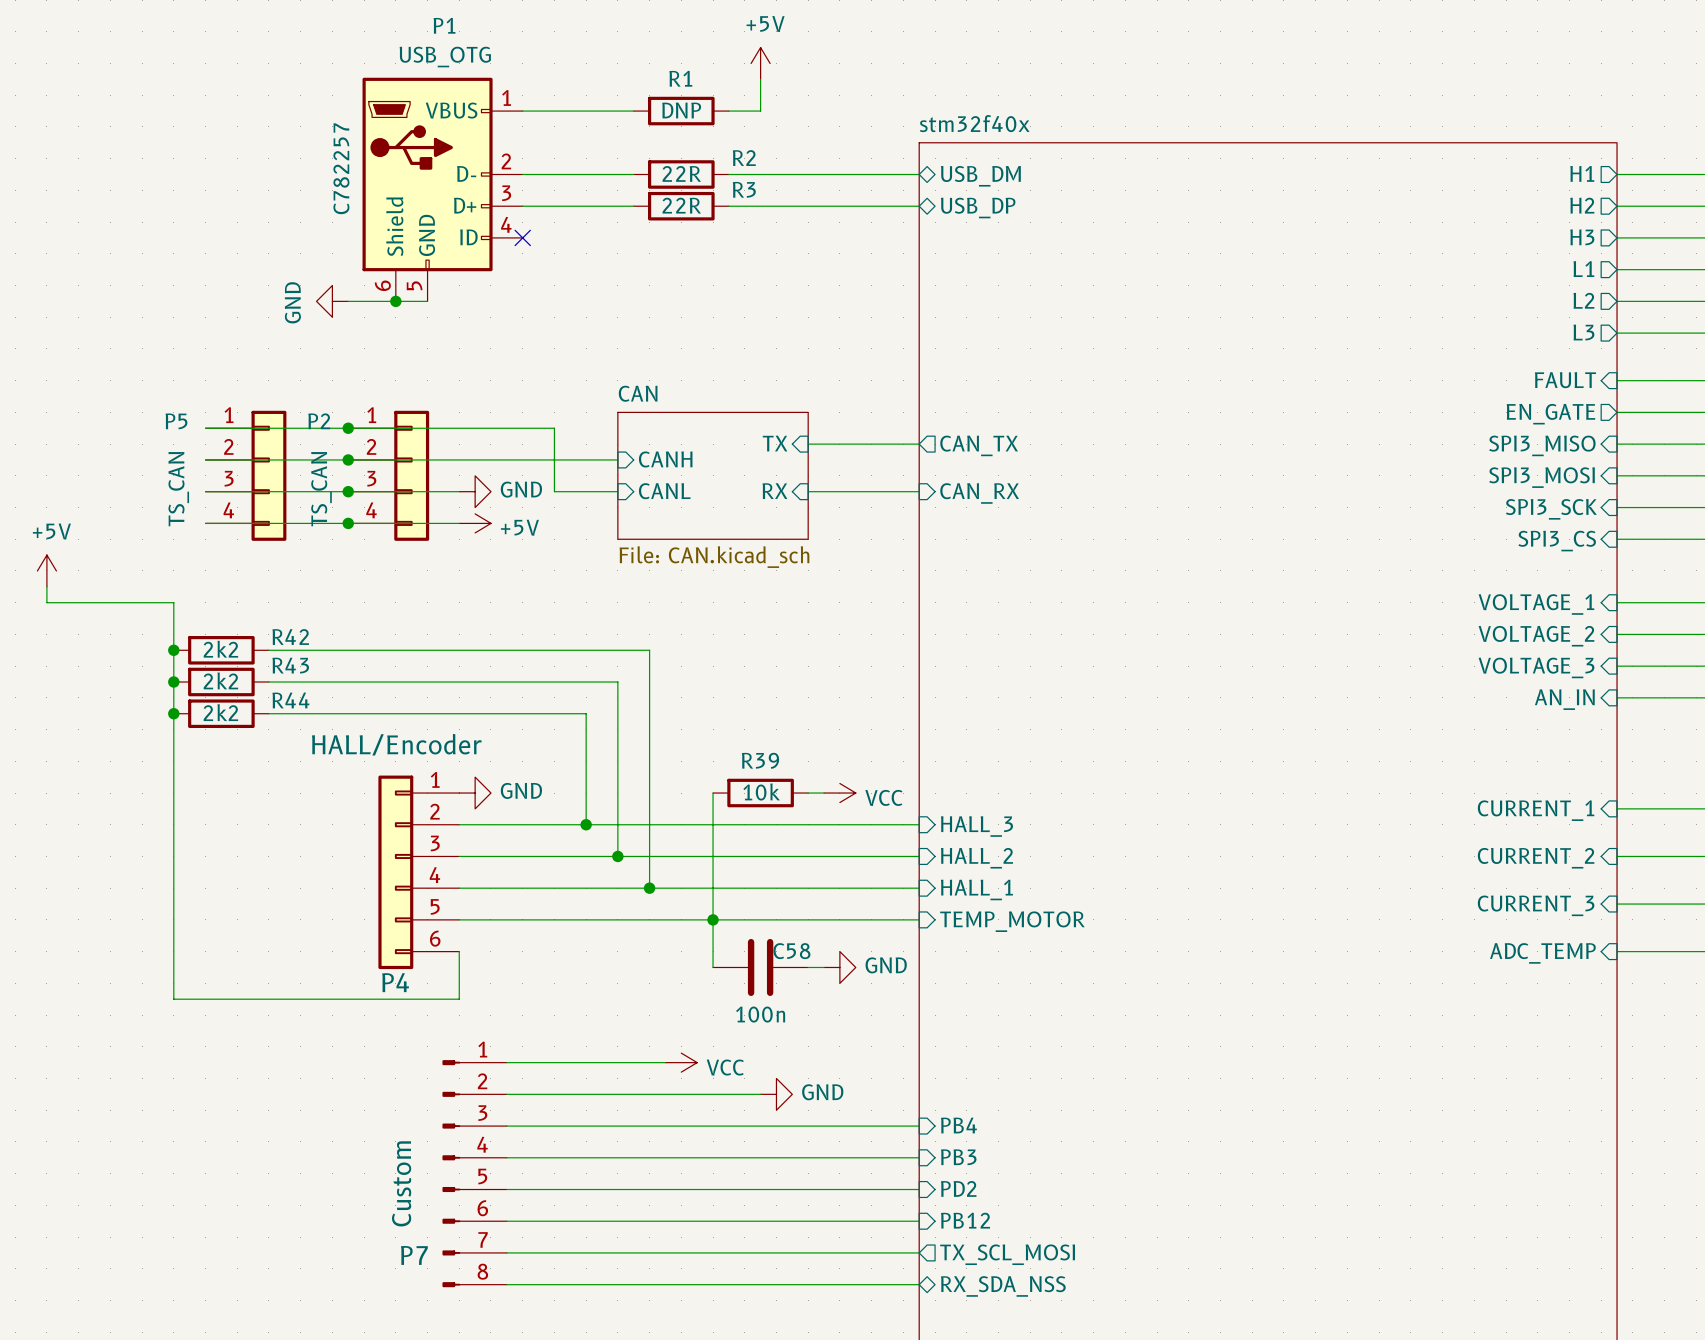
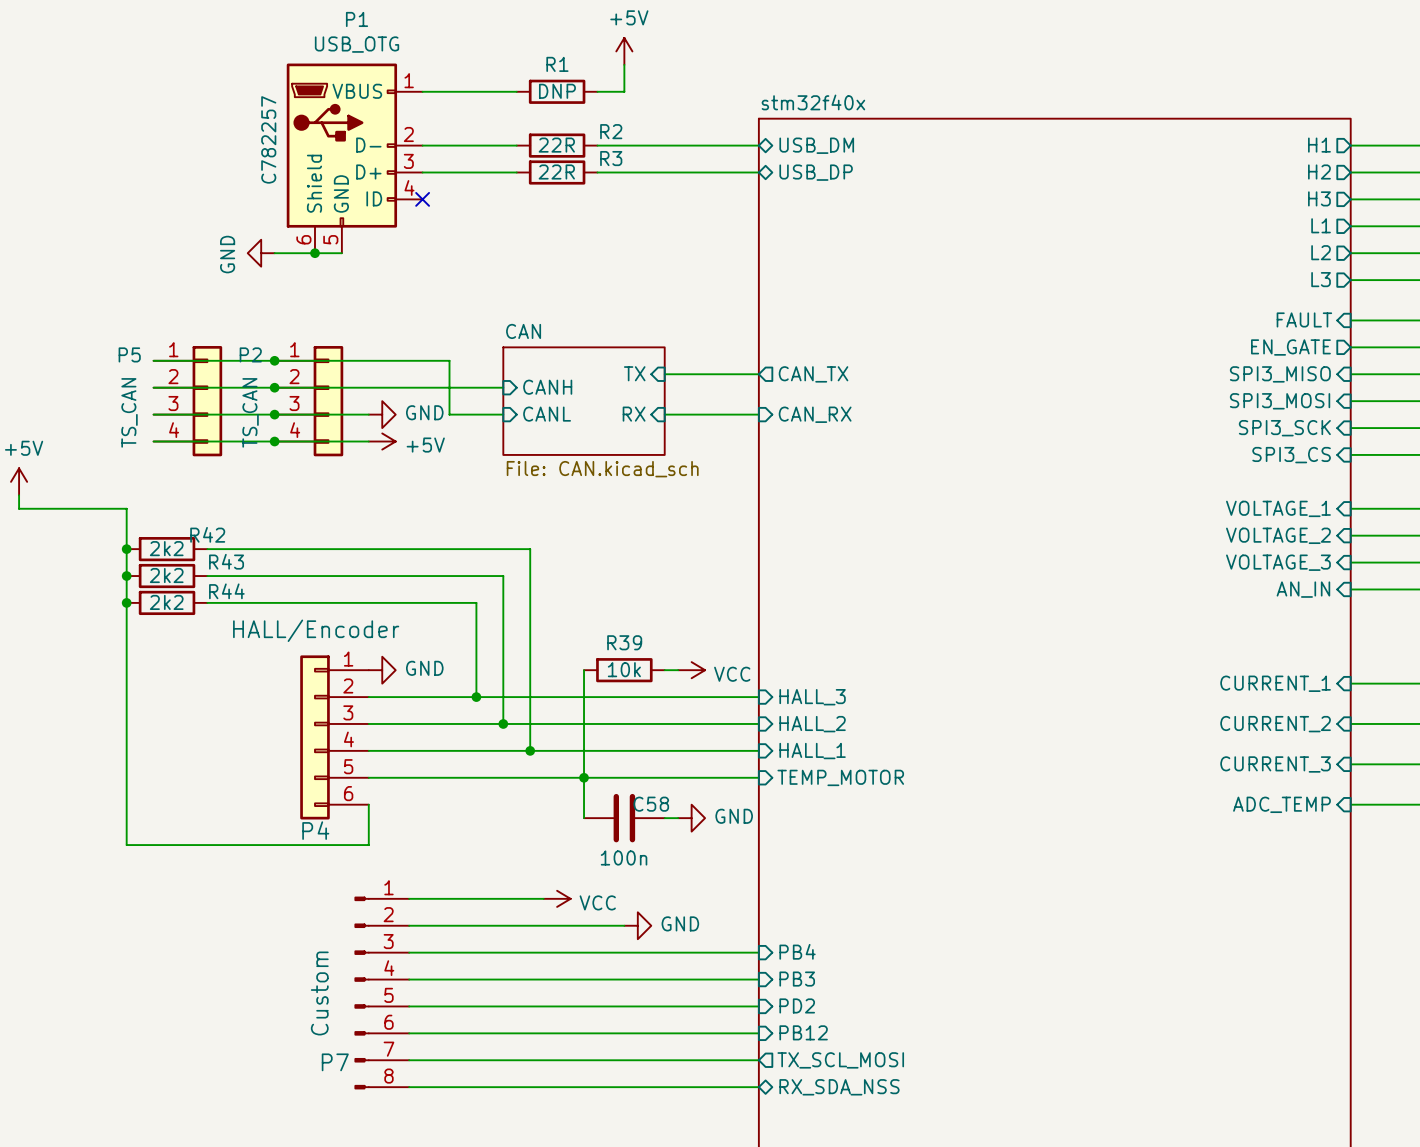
R42 name position: R42 (290, 637) -> R42 (207, 534)

